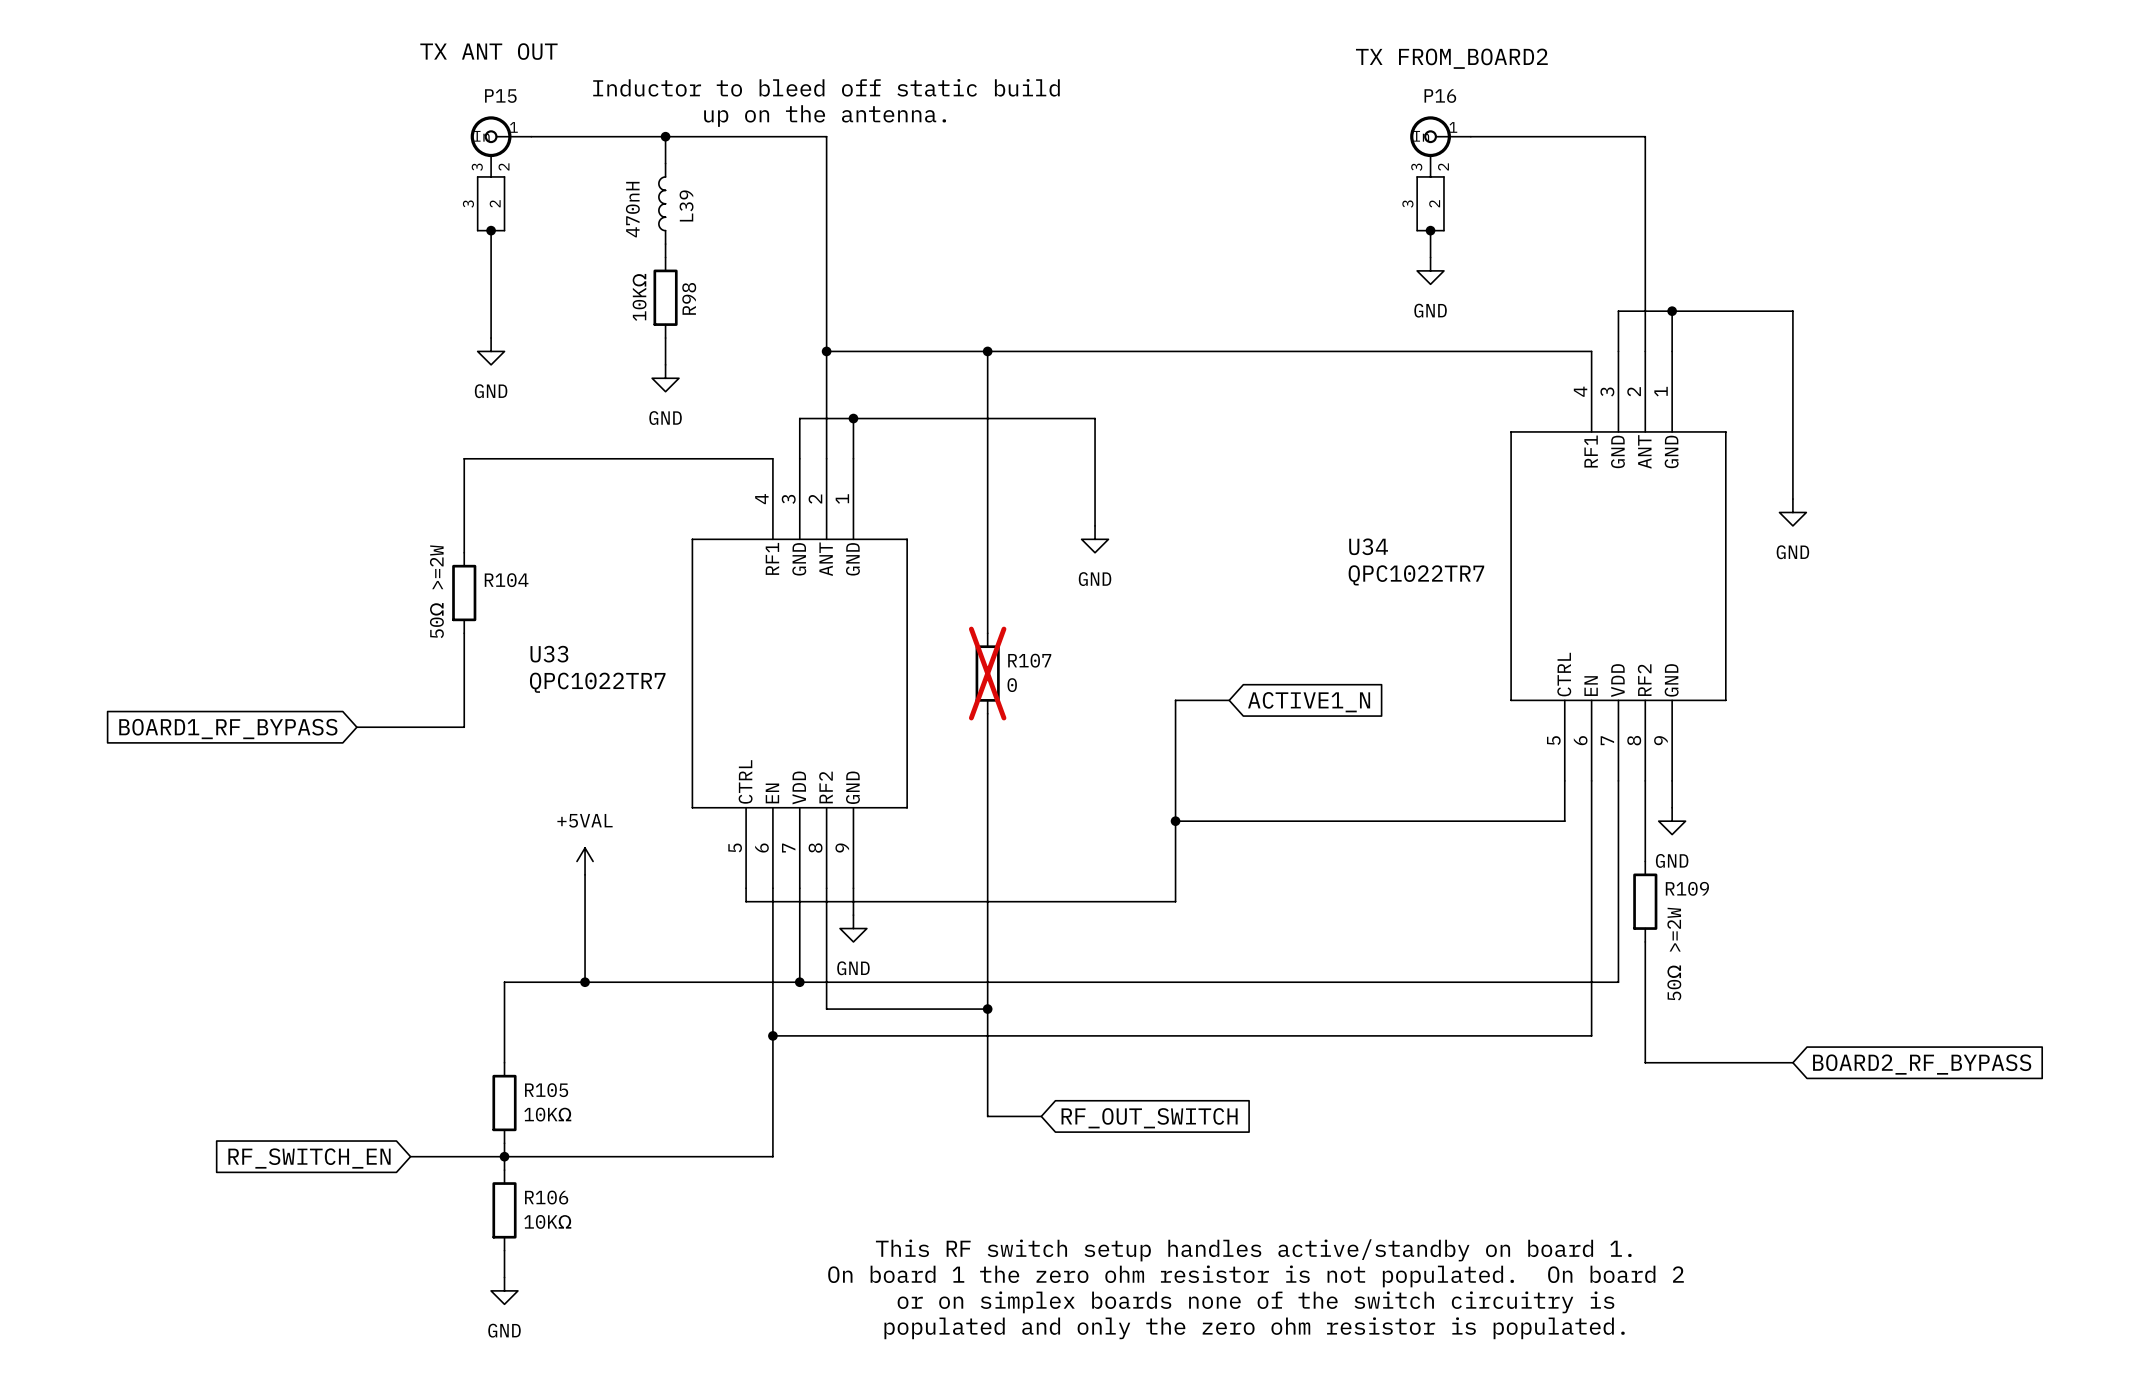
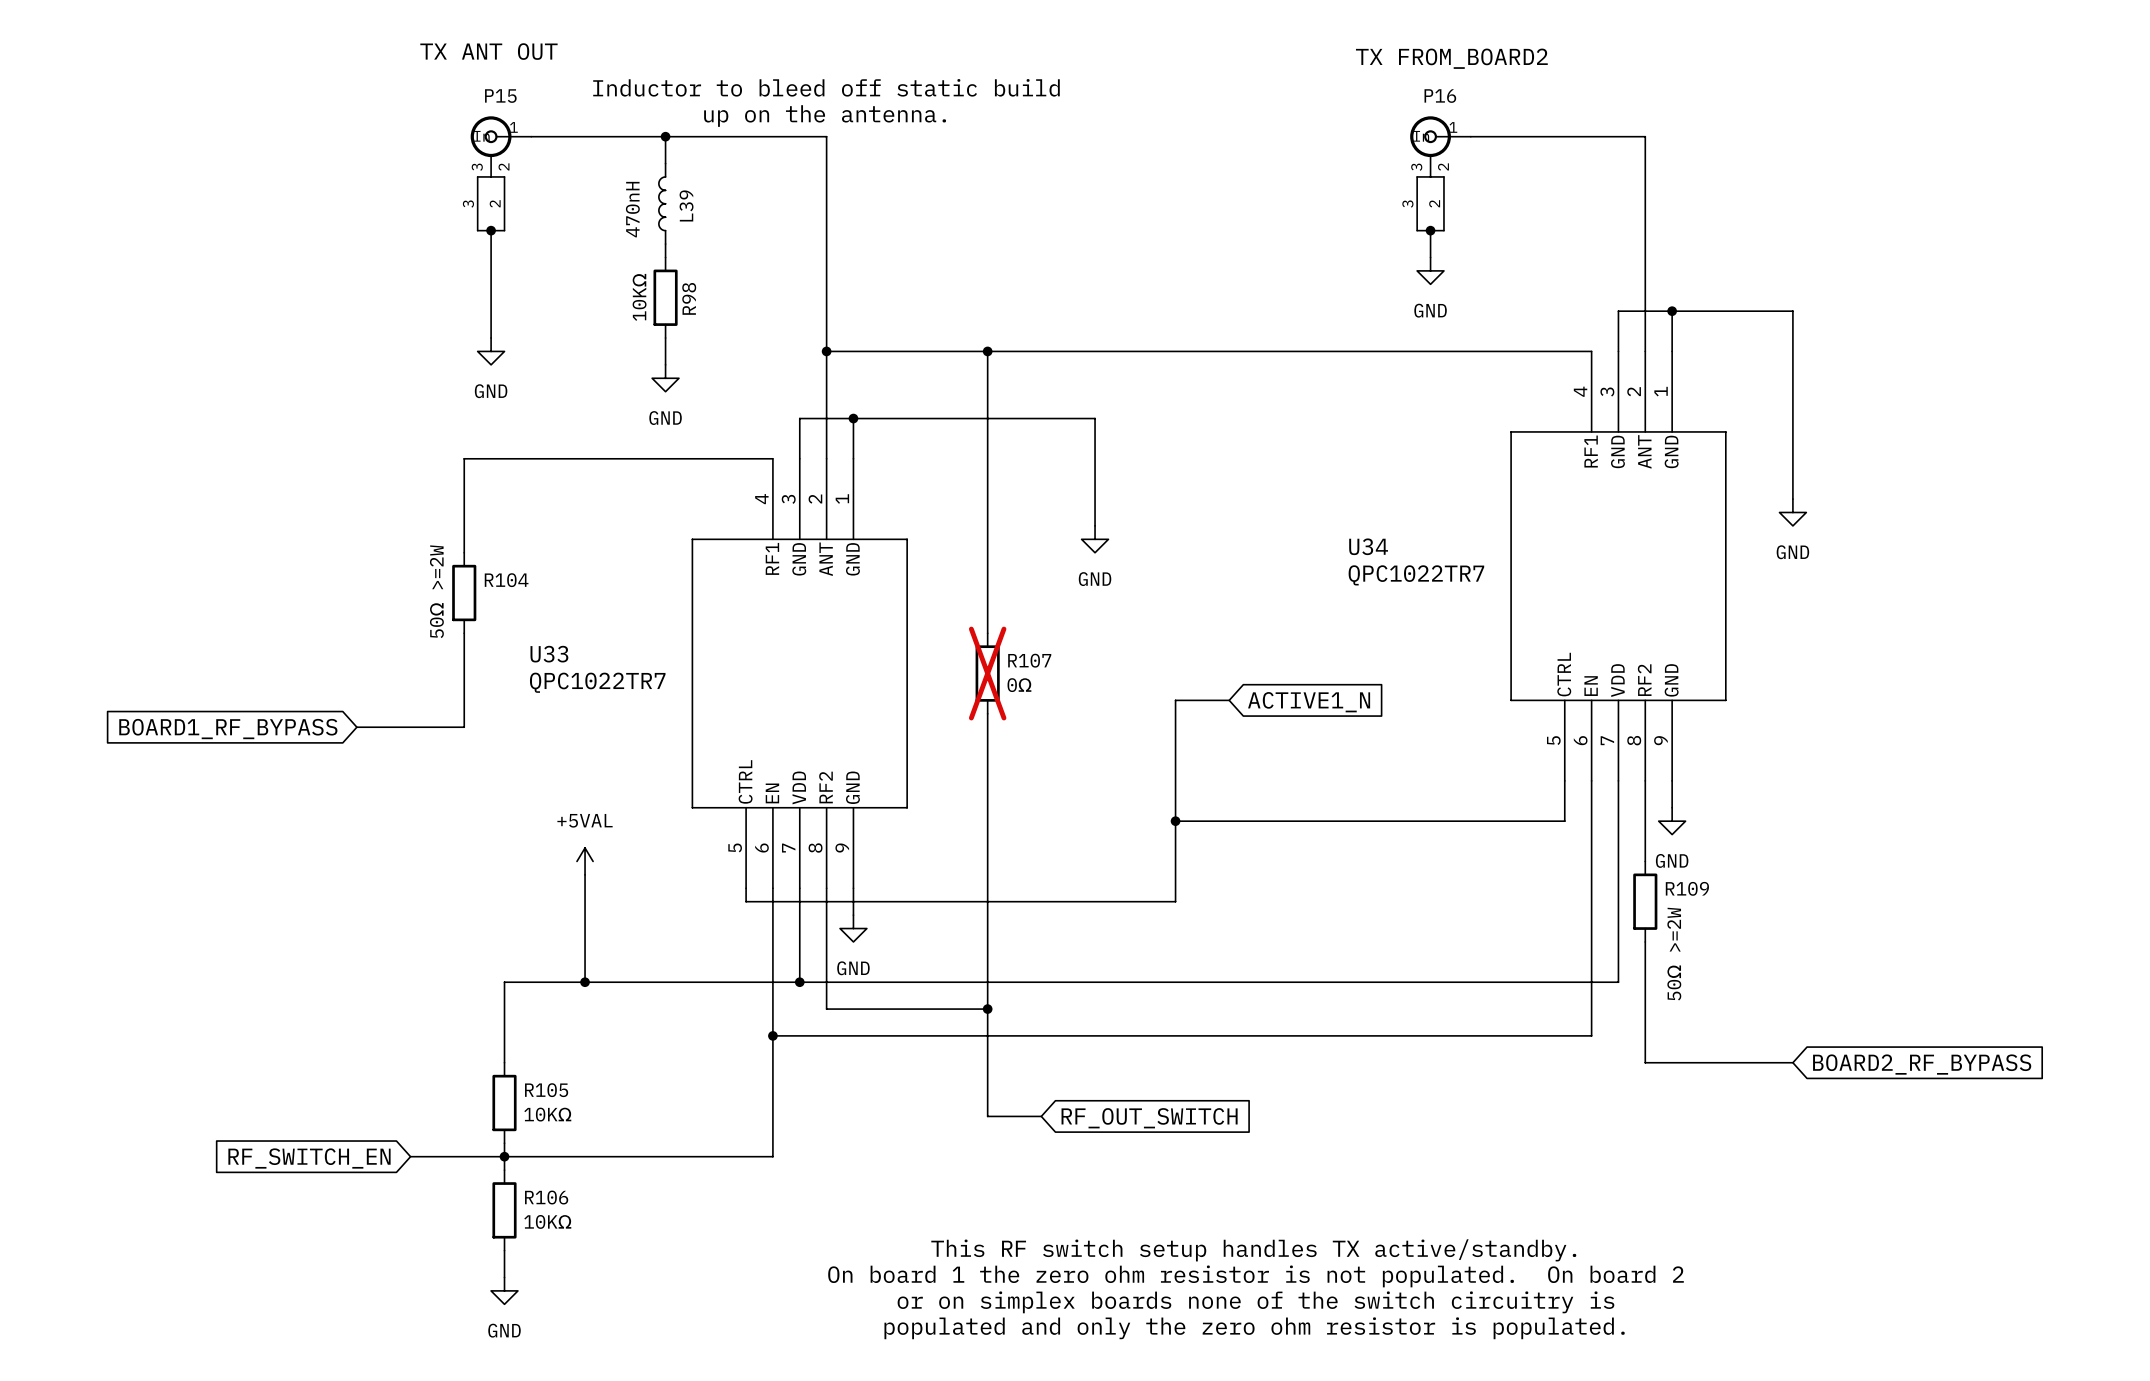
R107 value: 0 (1012, 685) -> 0Ω (1019, 685)
text: This RF switch setup handles active/standby on board 1. (1253, 1250) -> This RF switch setup handles TX active/standby. (1253, 1250)

